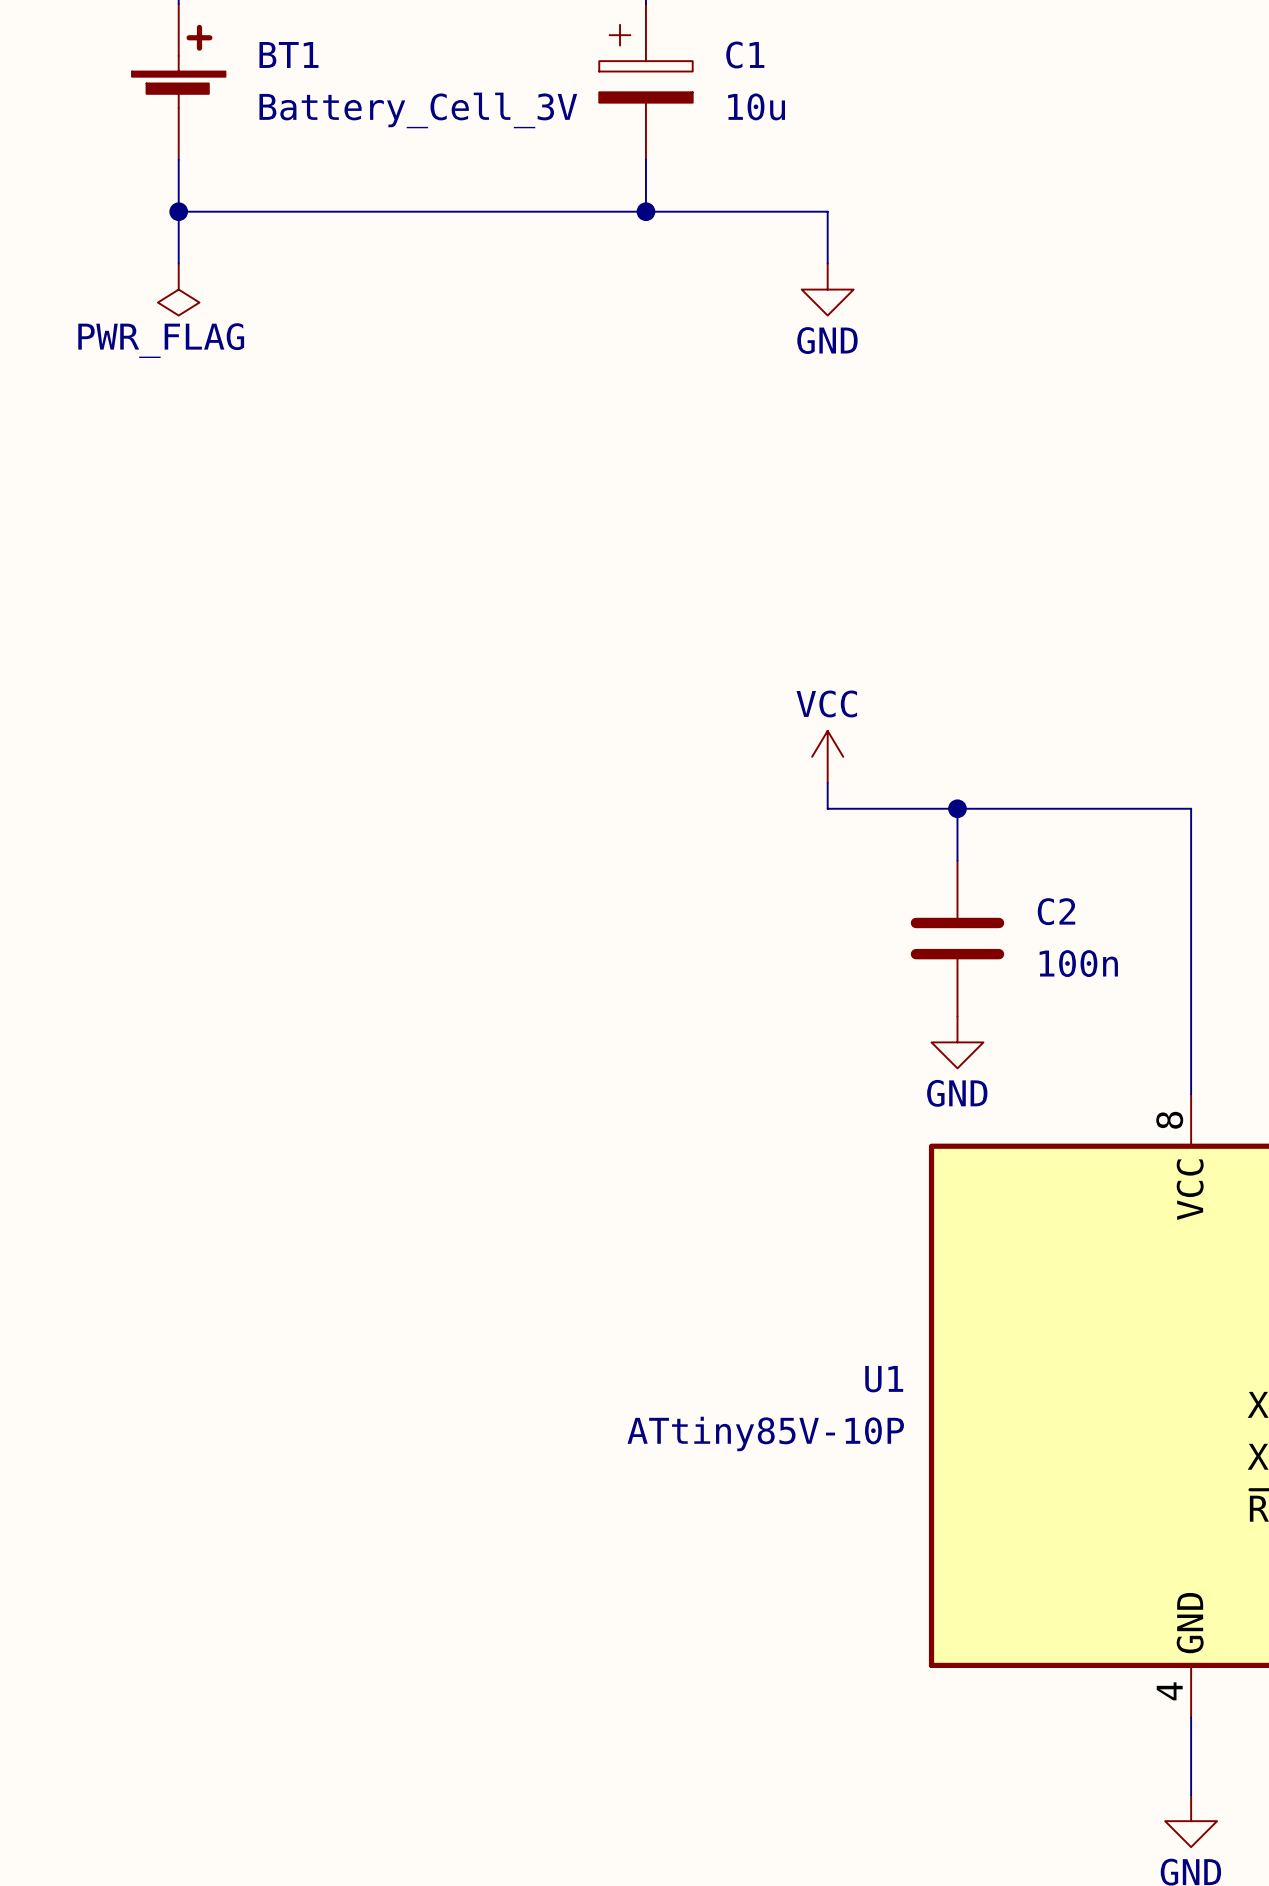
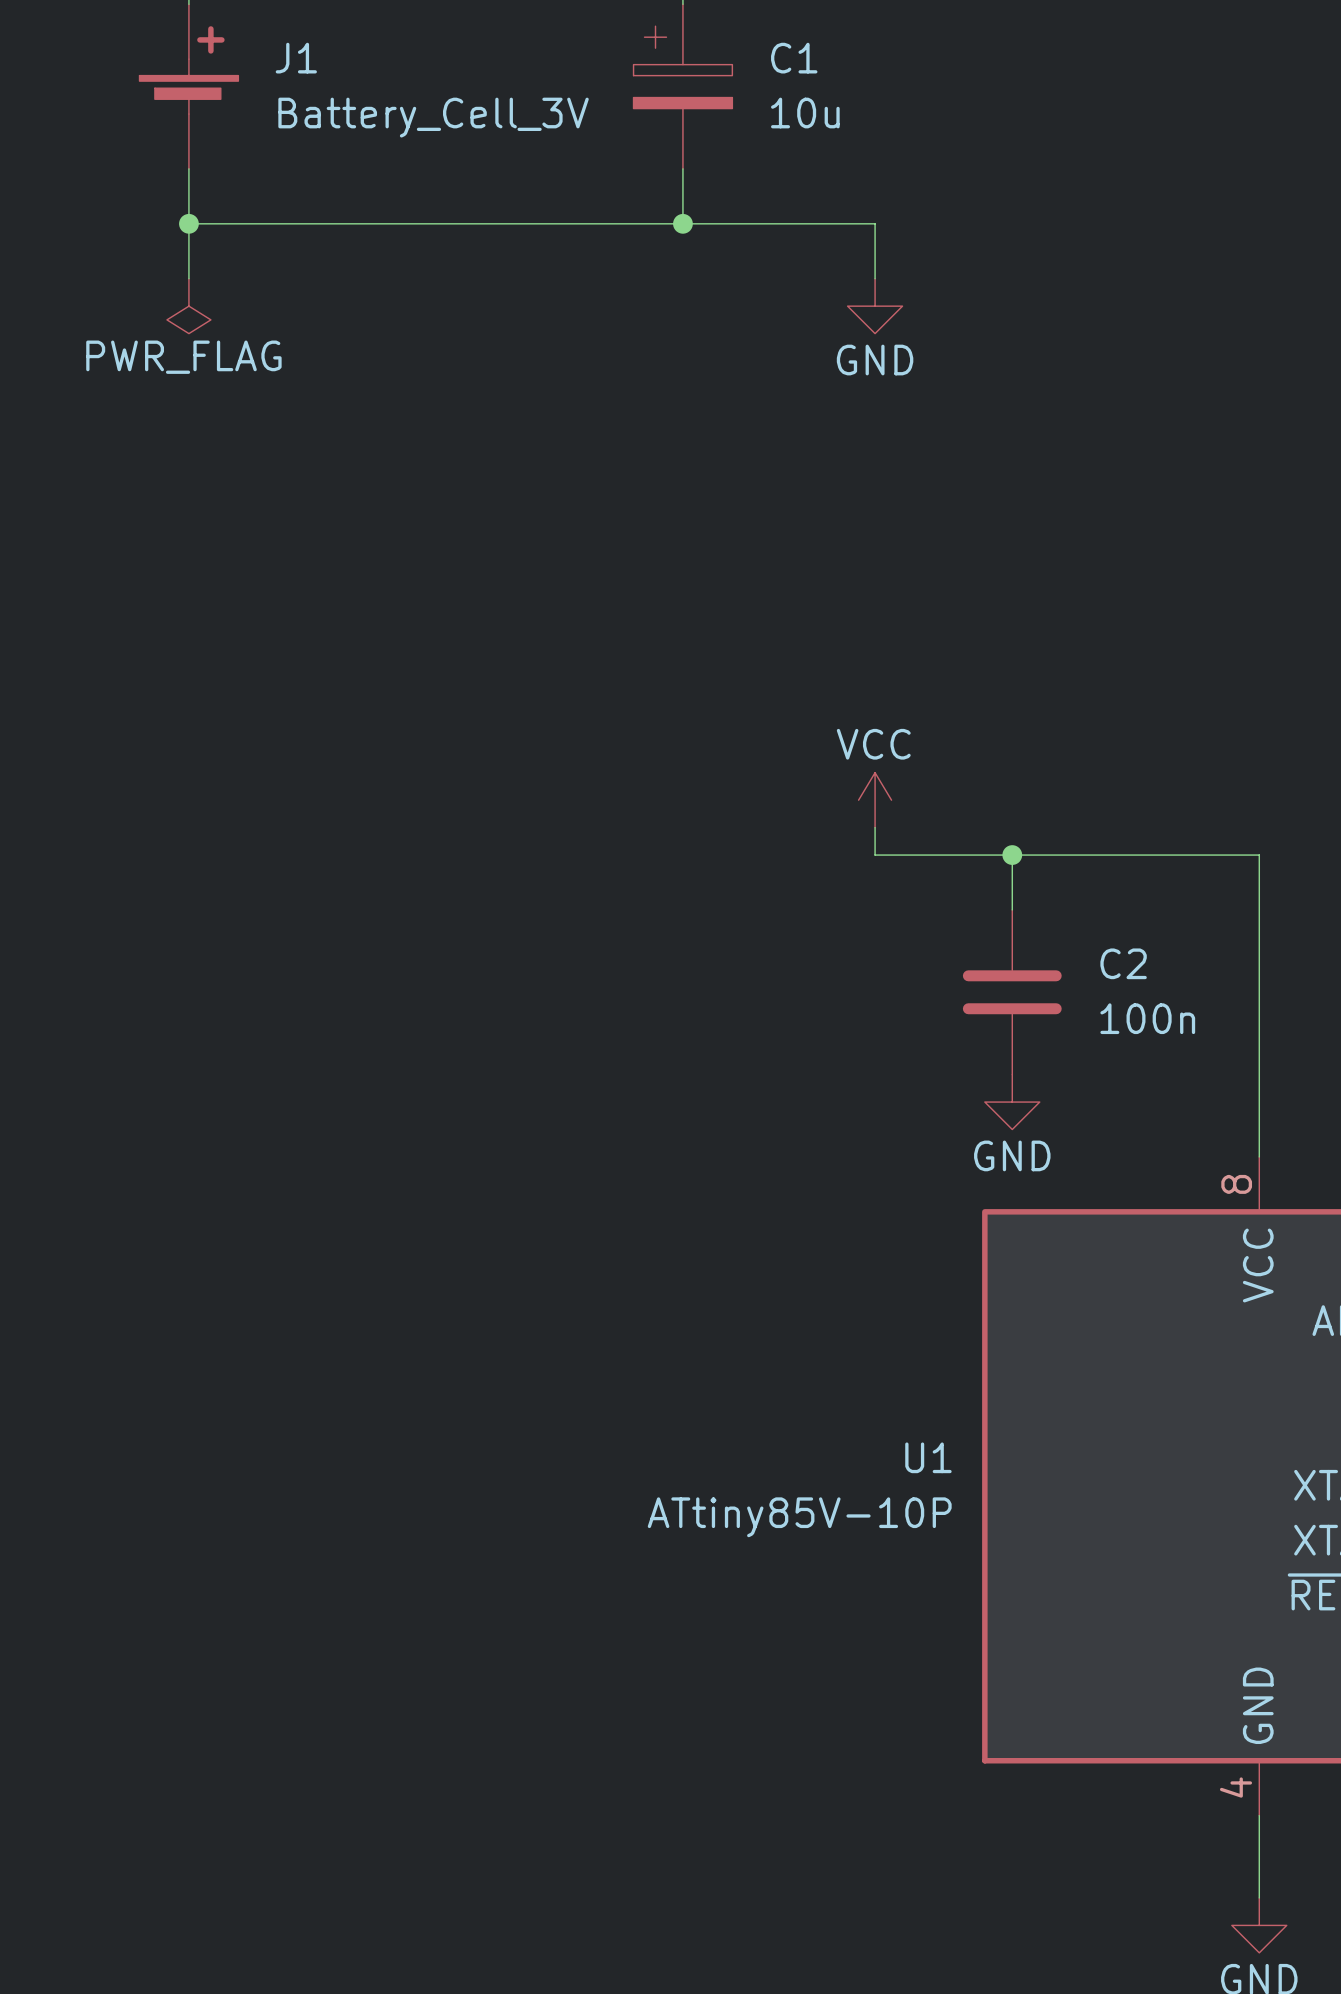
BT1 name: BT1 (288, 54) -> J1 (296, 58)

